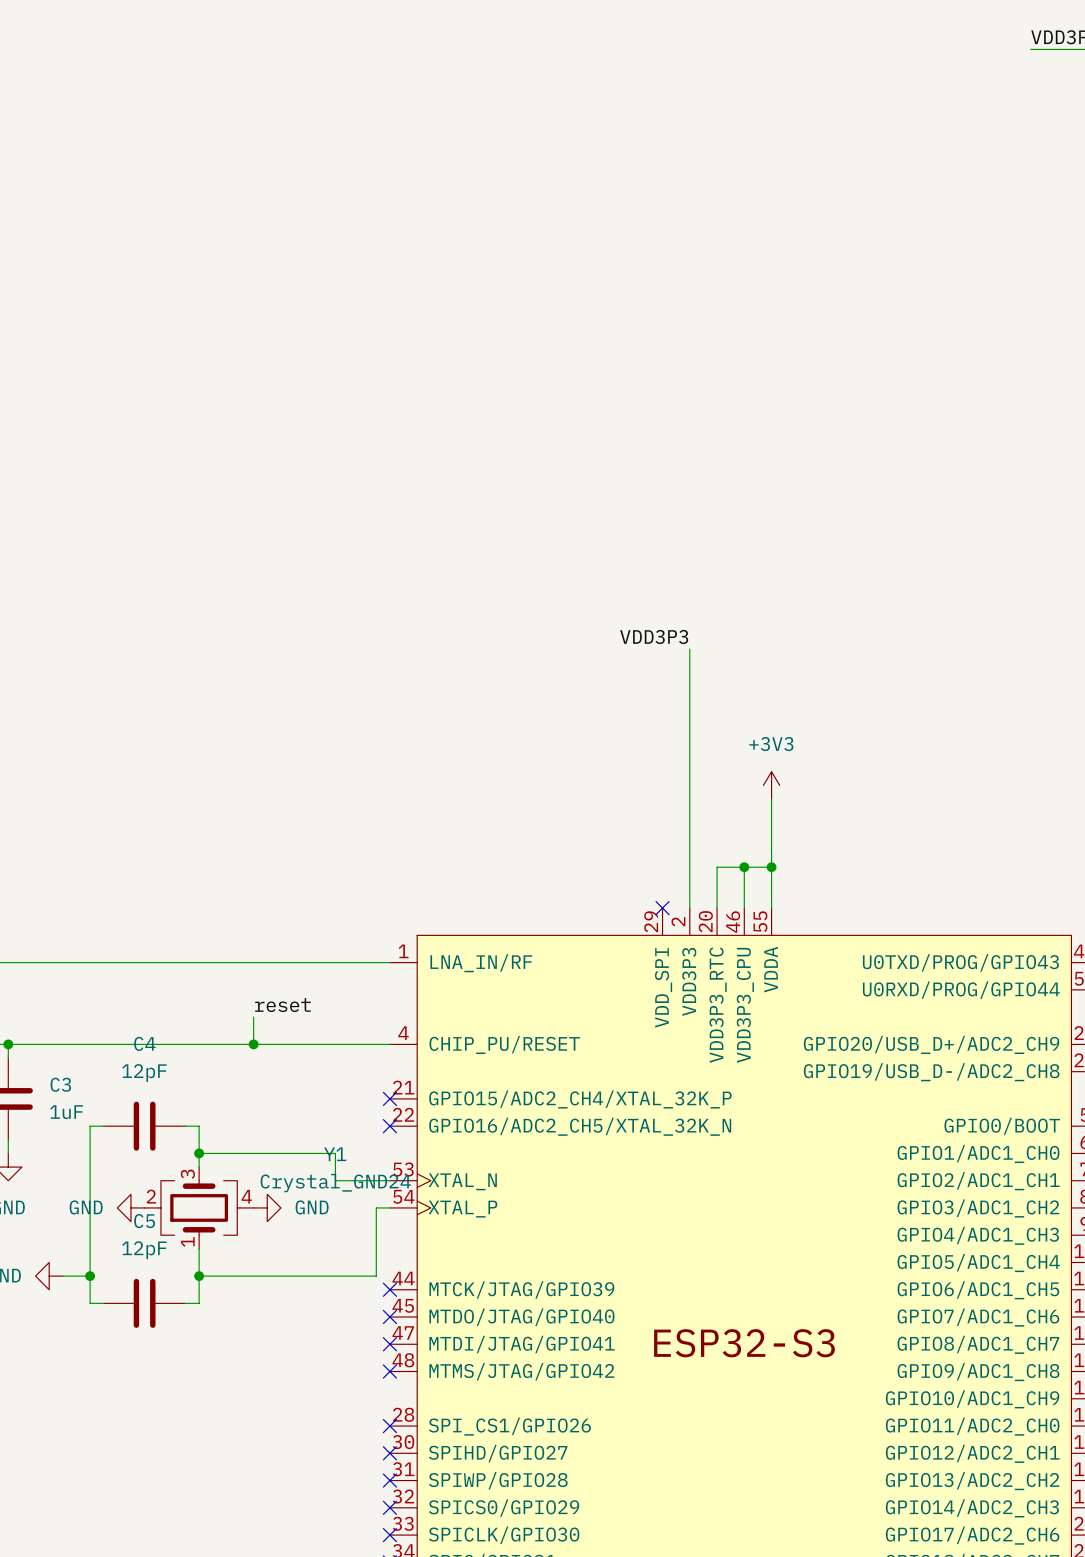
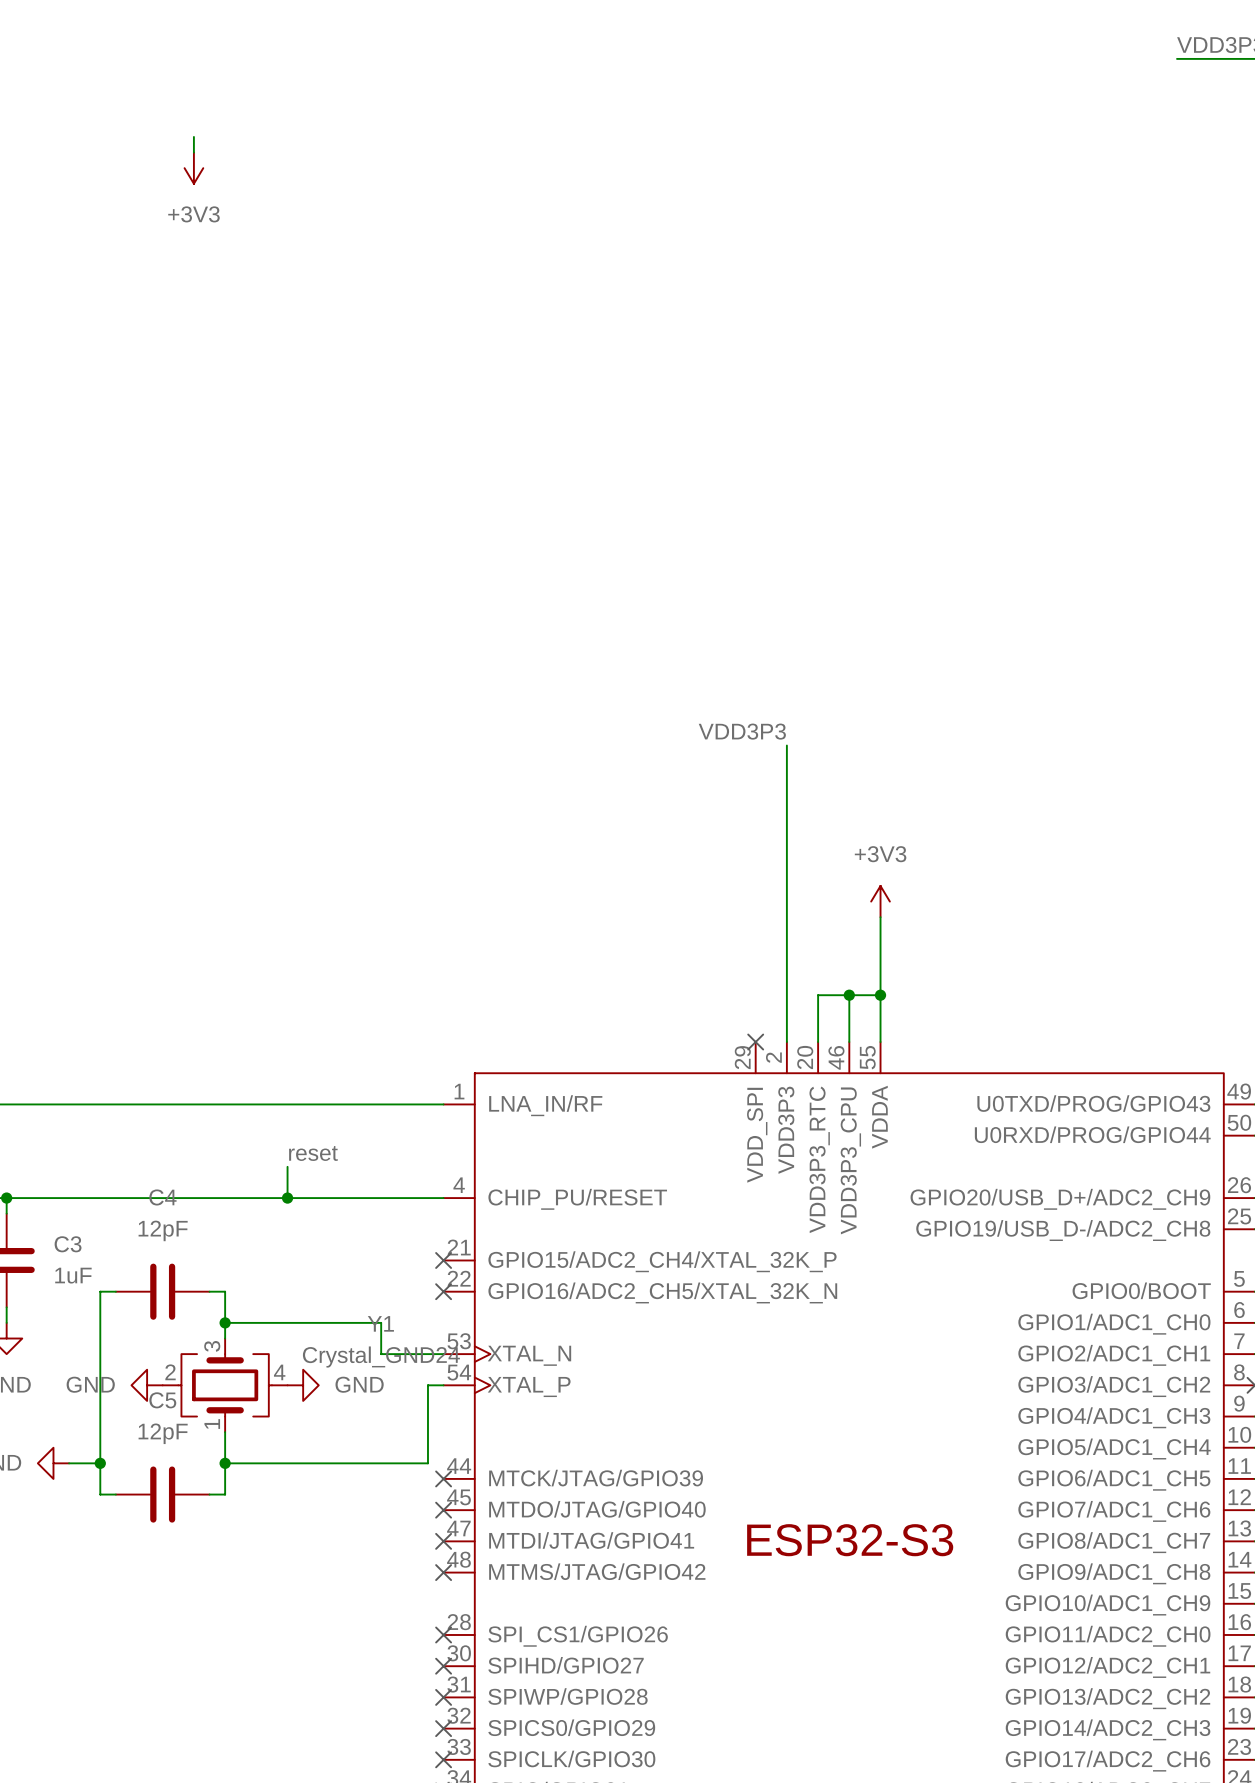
wire: none -> (193, 136) (193, 152)
power symbol: none -> +3V3 (193, 168)

